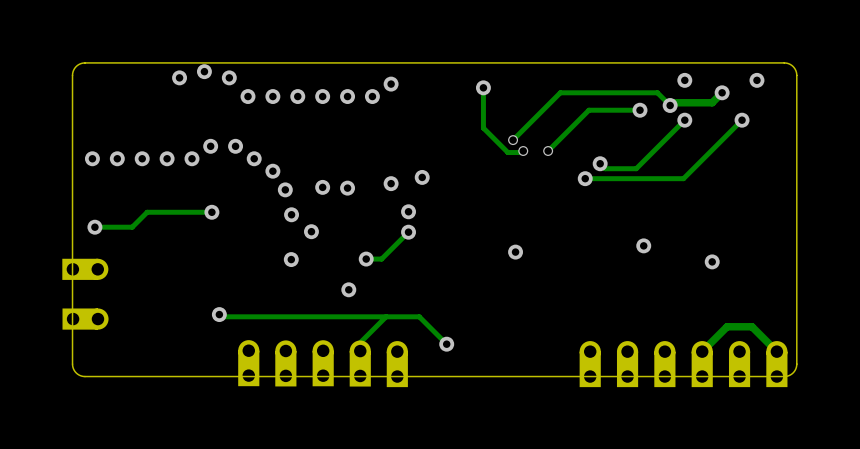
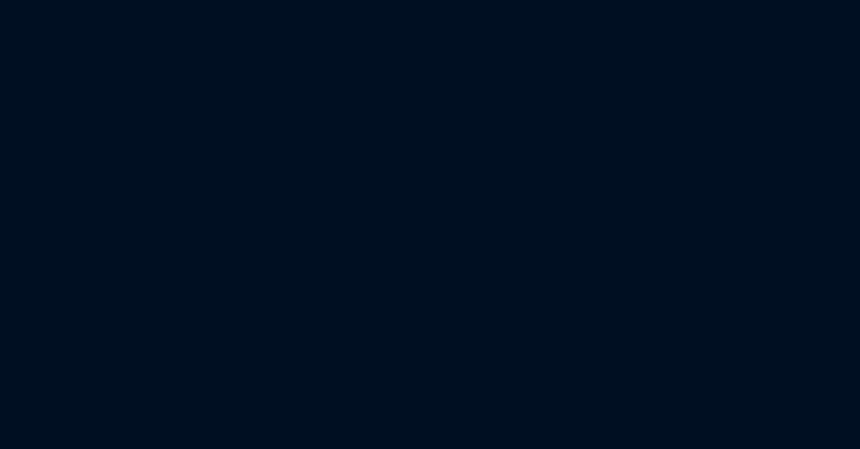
board edge: (784, 62) (80, 63) (75, 67) (72, 75) (73, 368) (78, 374) (84, 376) (789, 375) (795, 370) (796, 364) (796, 75) (793, 66) (784, 62) -> none
via: (204, 71) -> none
via: (179, 77) -> none
via: (229, 77) -> none
via: (684, 80) -> none
via: (756, 80) -> none
via: (391, 84) -> none
track: (483, 87) (483, 128) (507, 152) (523, 151) -> none
via: (483, 87) -> none
track: (722, 92) (712, 102) (672, 102) (670, 105) (657, 92) (560, 92) (513, 140) -> none
via: (722, 92) -> none
via: (247, 96) -> none
via: (272, 96) -> none
via: (297, 96) -> none
via: (322, 96) -> none
via: (347, 96) -> none
via: (372, 96) -> none
via: (670, 105) -> none
track: (640, 110) (588, 110) (548, 151) -> none
via: (640, 110) -> none
track: (684, 120) (636, 168) (605, 168) (600, 163) -> none
via: (684, 120) -> none
track: (742, 120) (683, 178) (585, 178) -> none
via: (742, 120) -> none
via: (513, 140) -> none
via: (210, 146) -> none
via: (235, 146) -> none
via: (523, 151) -> none
via: (548, 151) -> none
via: (92, 158) -> none
via: (117, 158) -> none
via: (142, 158) -> none
via: (167, 158) -> none
via: (191, 158) -> none
via: (254, 158) -> none
via: (600, 163) -> none
via: (272, 171) -> none
via: (422, 177) -> none
via: (585, 178) -> none
via: (391, 183) -> none
via: (322, 187) -> none
via: (347, 188) -> none
via: (285, 189) -> none
via: (408, 211) -> none
track: (211, 212) (147, 212) (132, 227) (94, 227) -> none
via: (211, 212) -> none
via: (291, 214) -> none
via: (94, 227) -> none
via: (311, 231) -> none
track: (408, 232) (381, 259) (366, 259) -> none
via: (408, 232) -> none
via: (643, 245) -> none
via: (515, 252) -> none
via: (291, 259) -> none
via: (366, 259) -> none
via: (712, 261) -> none
part: (85, 269) -> none
via: (348, 289) -> none
track: (219, 314) (221, 316) (419, 316) (446, 344) -> none
via: (219, 314) -> none
track: (386, 316) (360, 342) (360, 351) -> none
part: (85, 319) -> none
via: (446, 344) -> none
track: (776, 351) (752, 326) (727, 326) (702, 351) -> none
part: (248, 363) -> none
part: (285, 363) -> none
part: (323, 363) -> none
part: (360, 363) -> none
part: (397, 364) -> none
part: (590, 364) -> none
part: (627, 364) -> none
part: (664, 364) -> none
part: (702, 364) -> none
part: (739, 364) -> none
part: (776, 364) -> none

